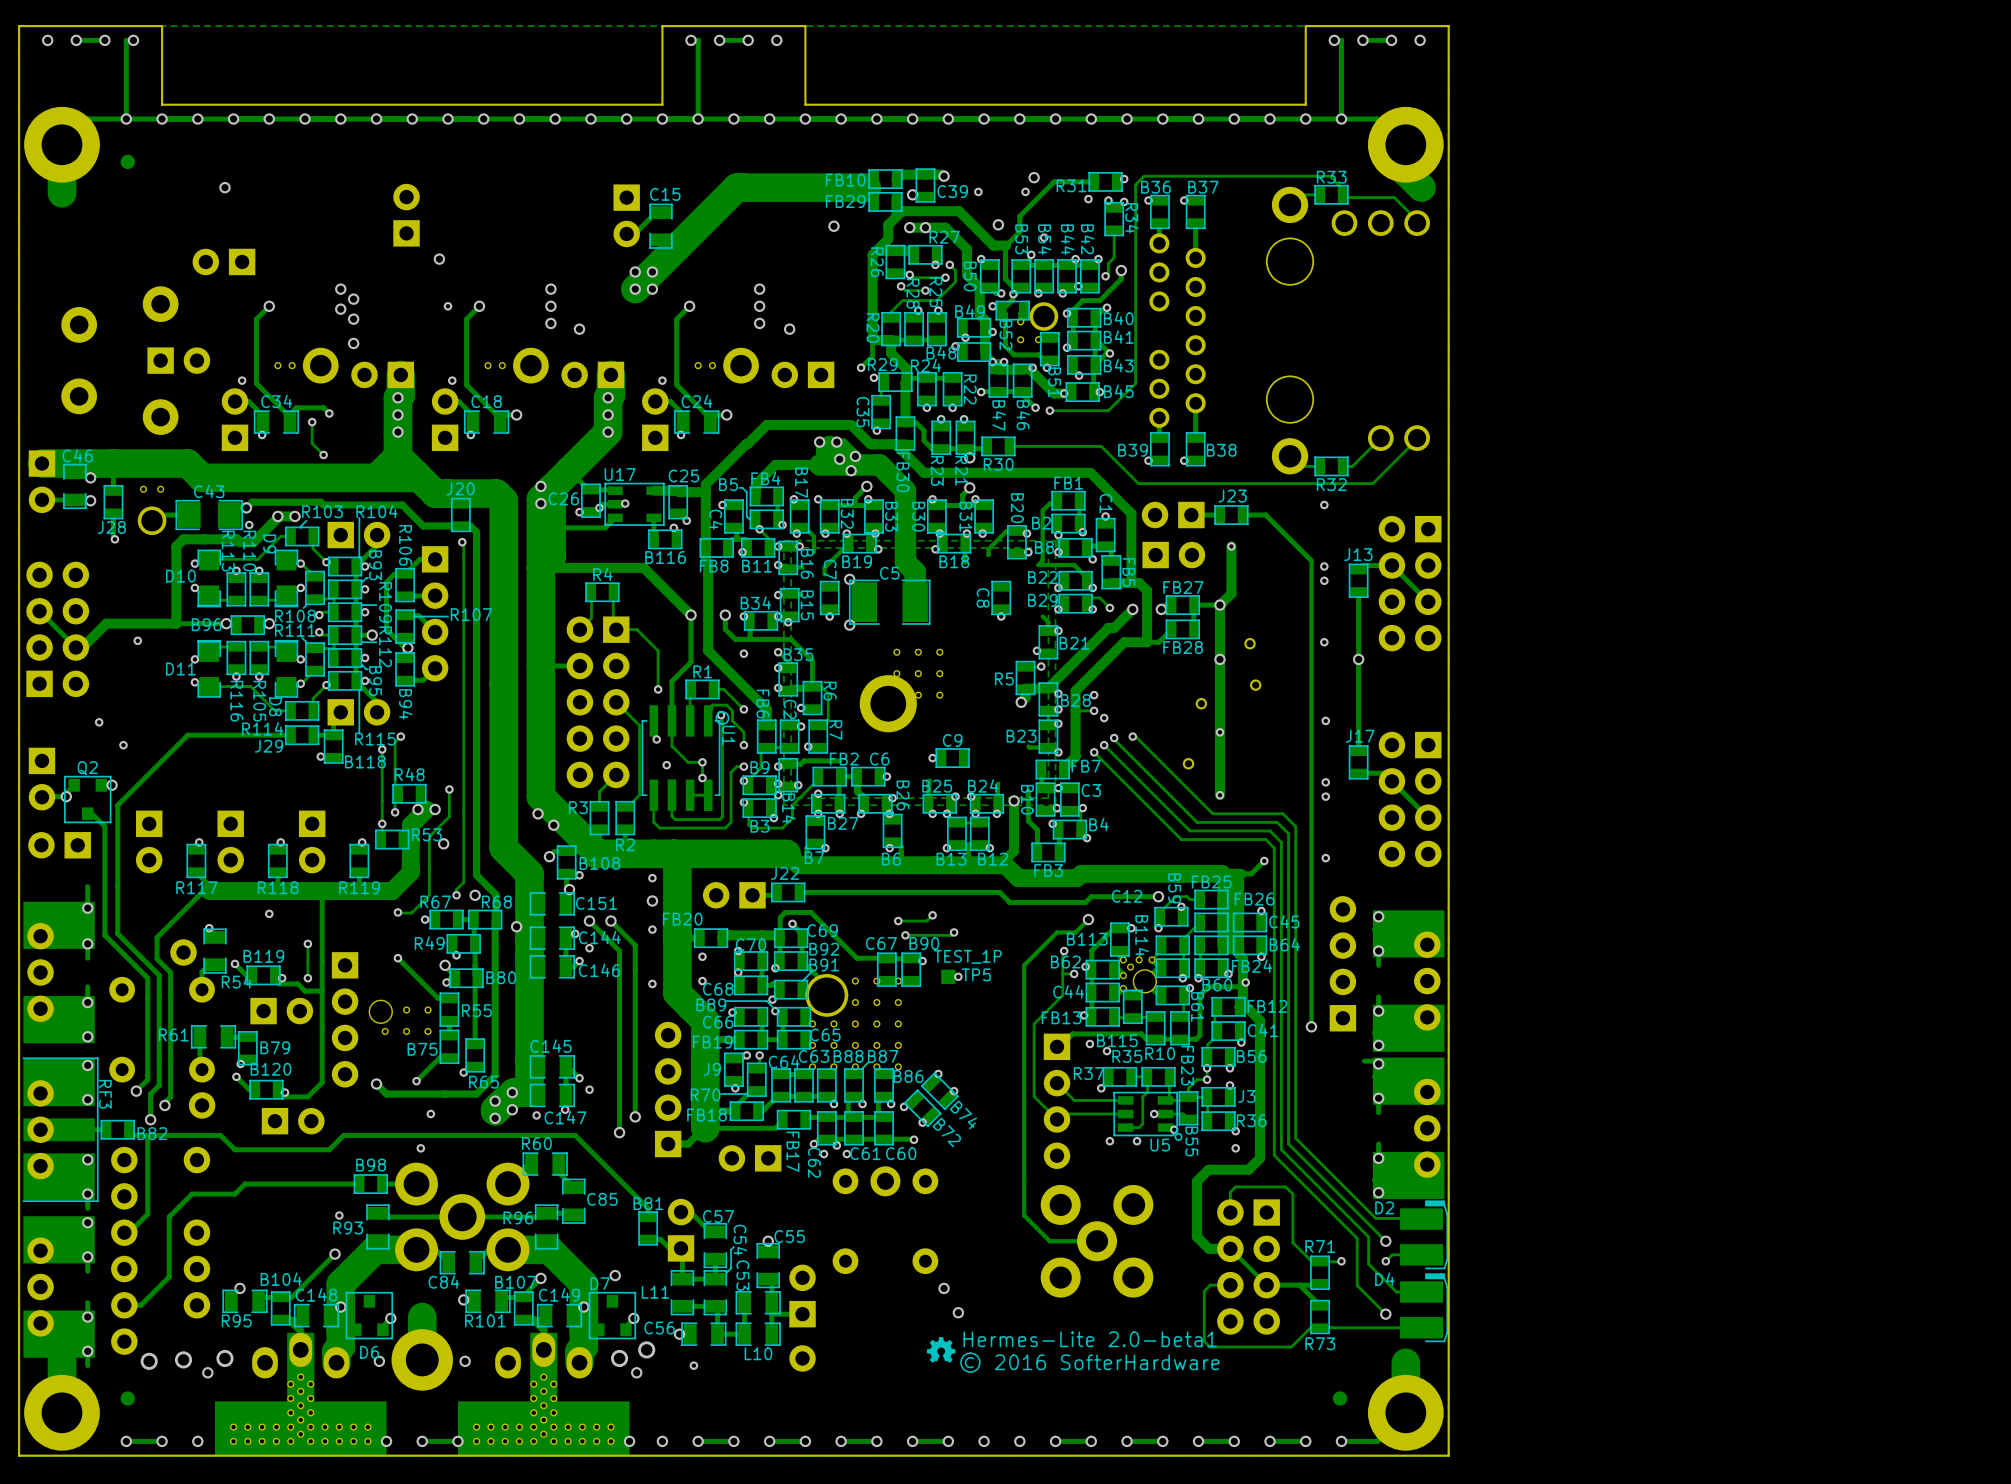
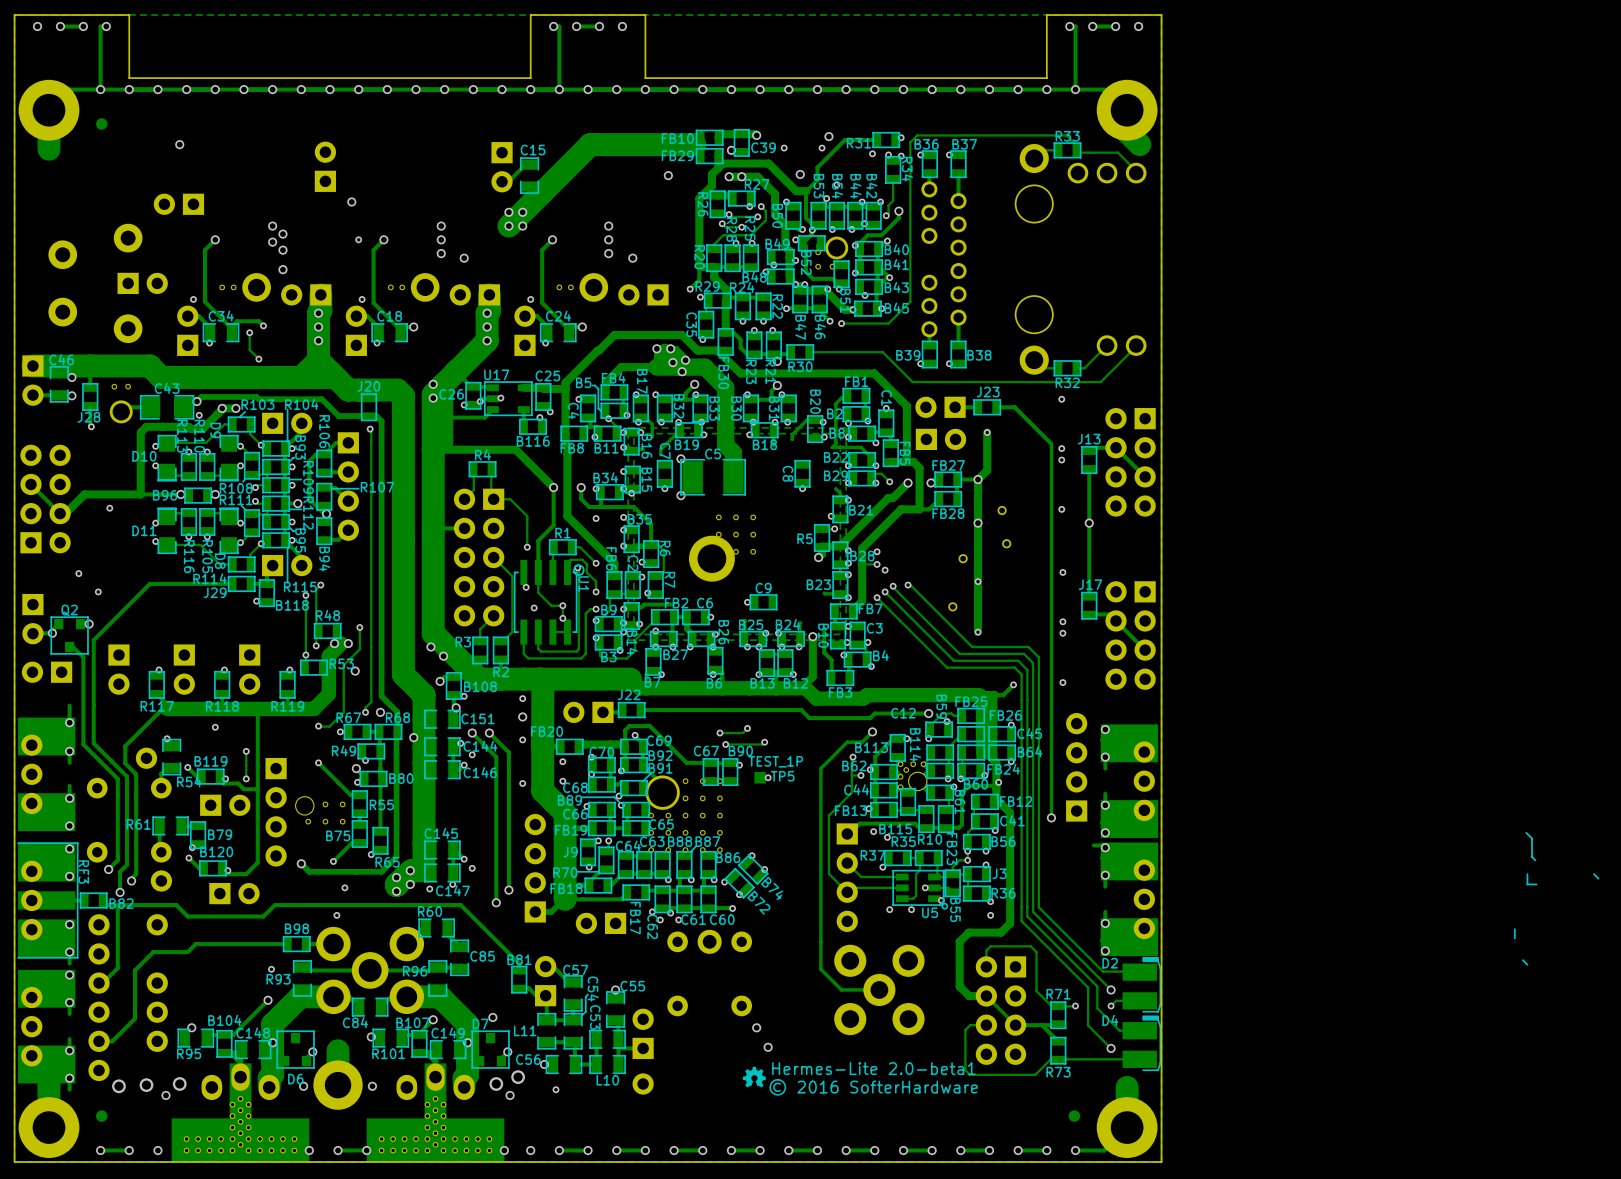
line: none -> (1526, 832) (1532, 838) (1532, 856) (1535, 860)
line: none -> (1527, 874) (1527, 884) (1536, 884)
line: none -> (1593, 874) (1598, 878)
line: none -> (1514, 929) (1514, 938)
line: none -> (1522, 960) (1527, 964)
track: none -> (817, 1150) (788, 1150)

